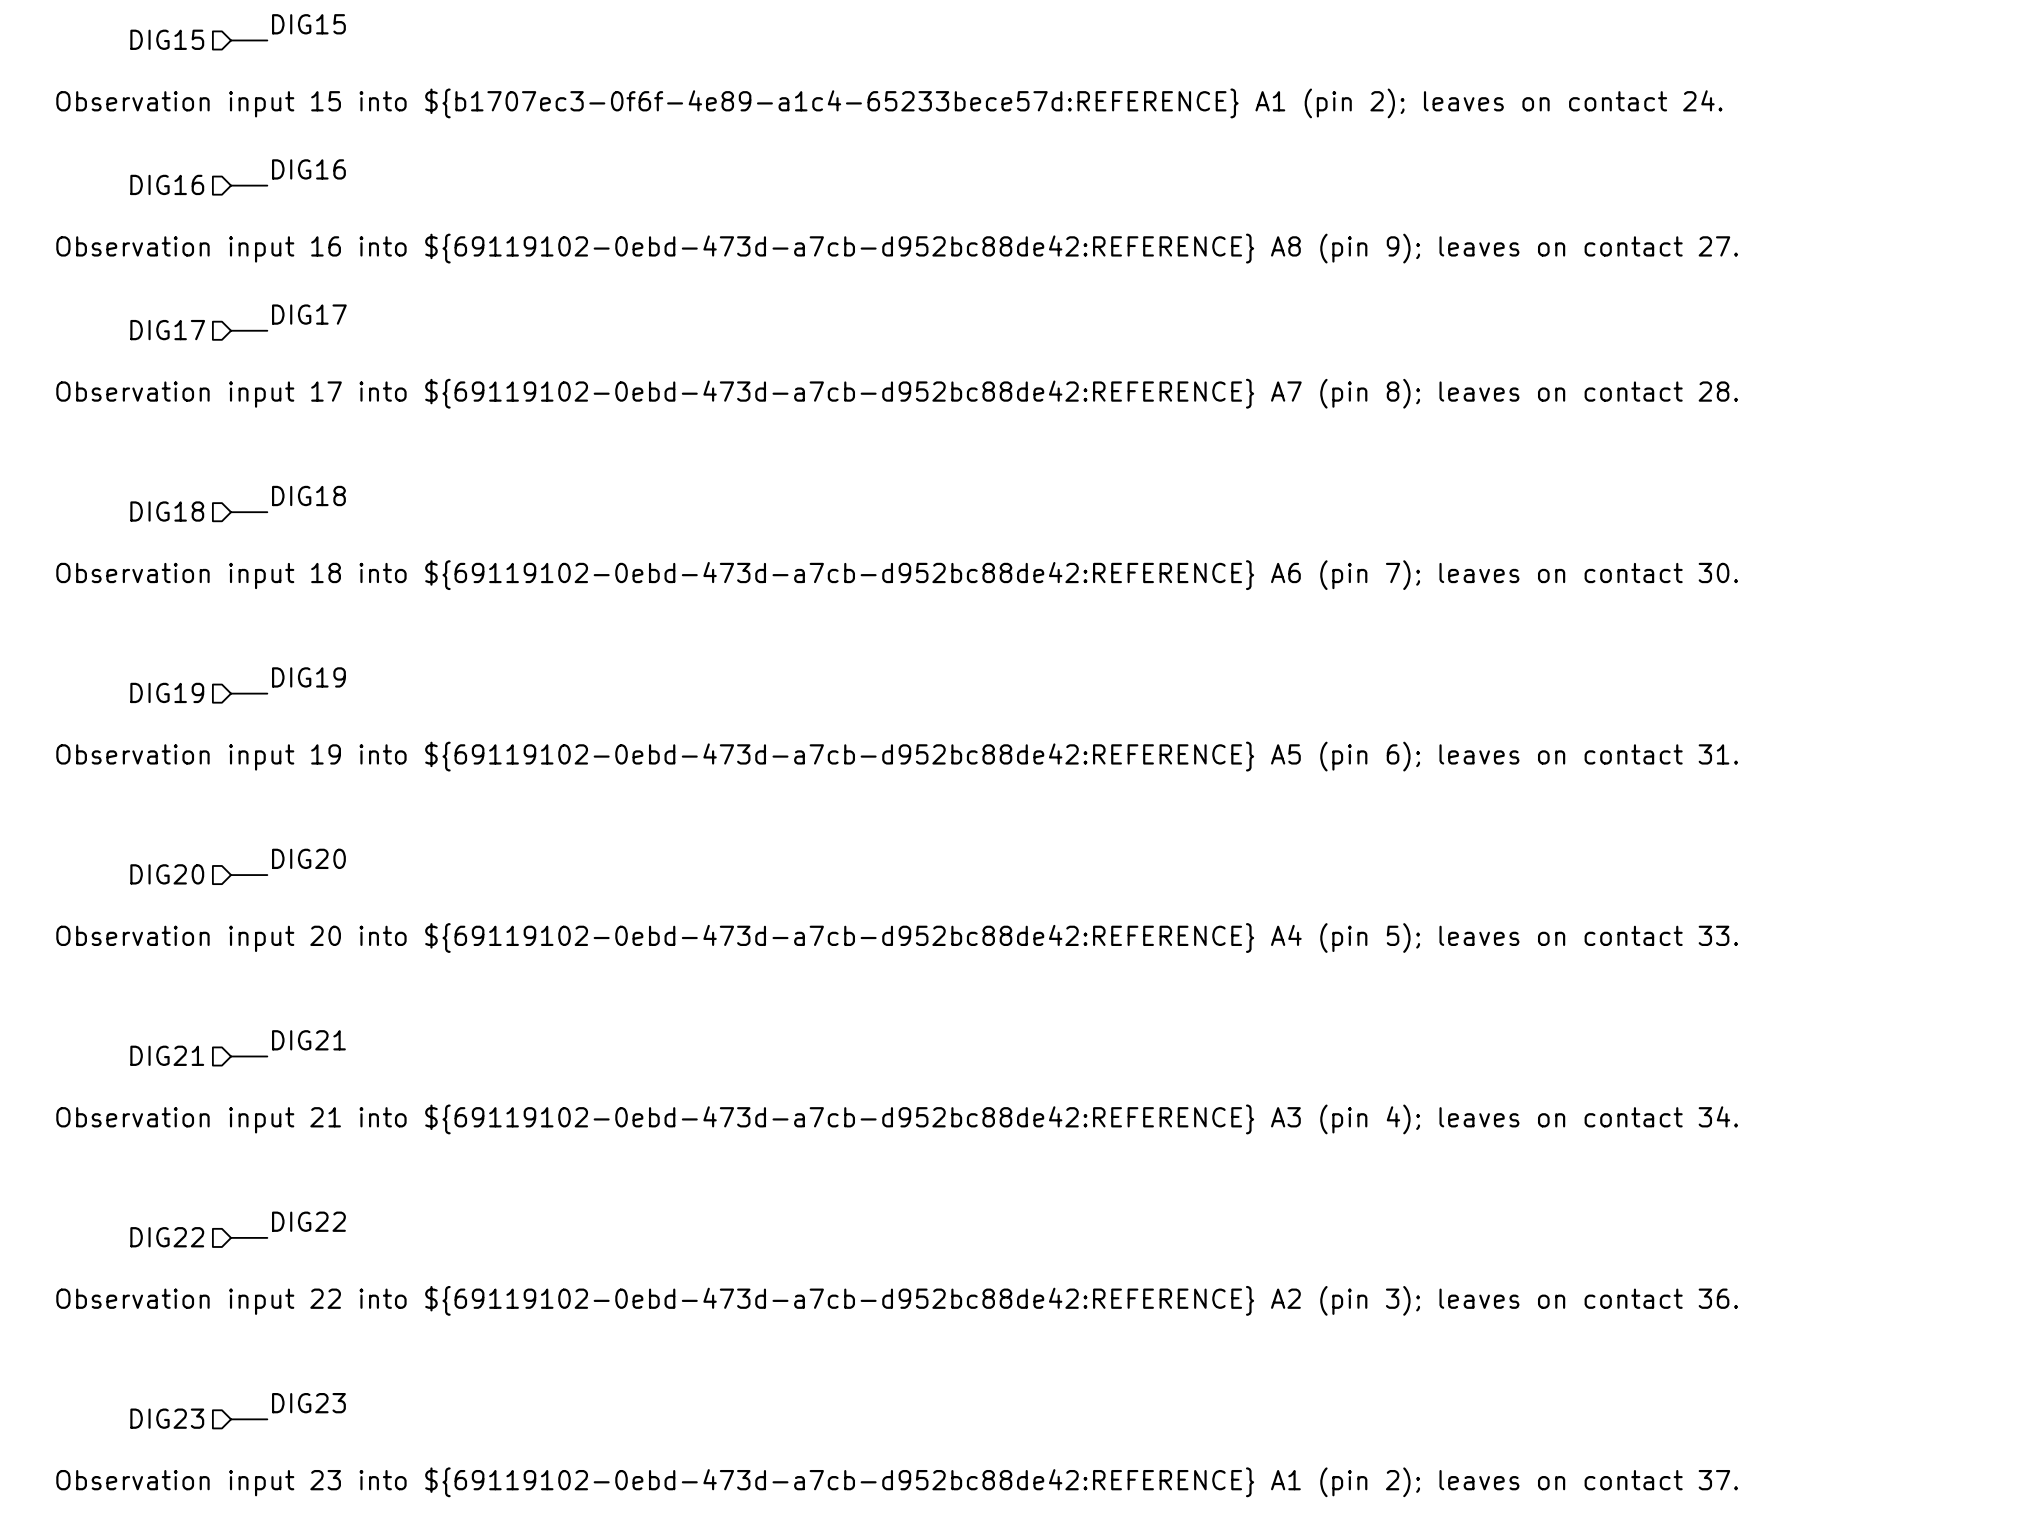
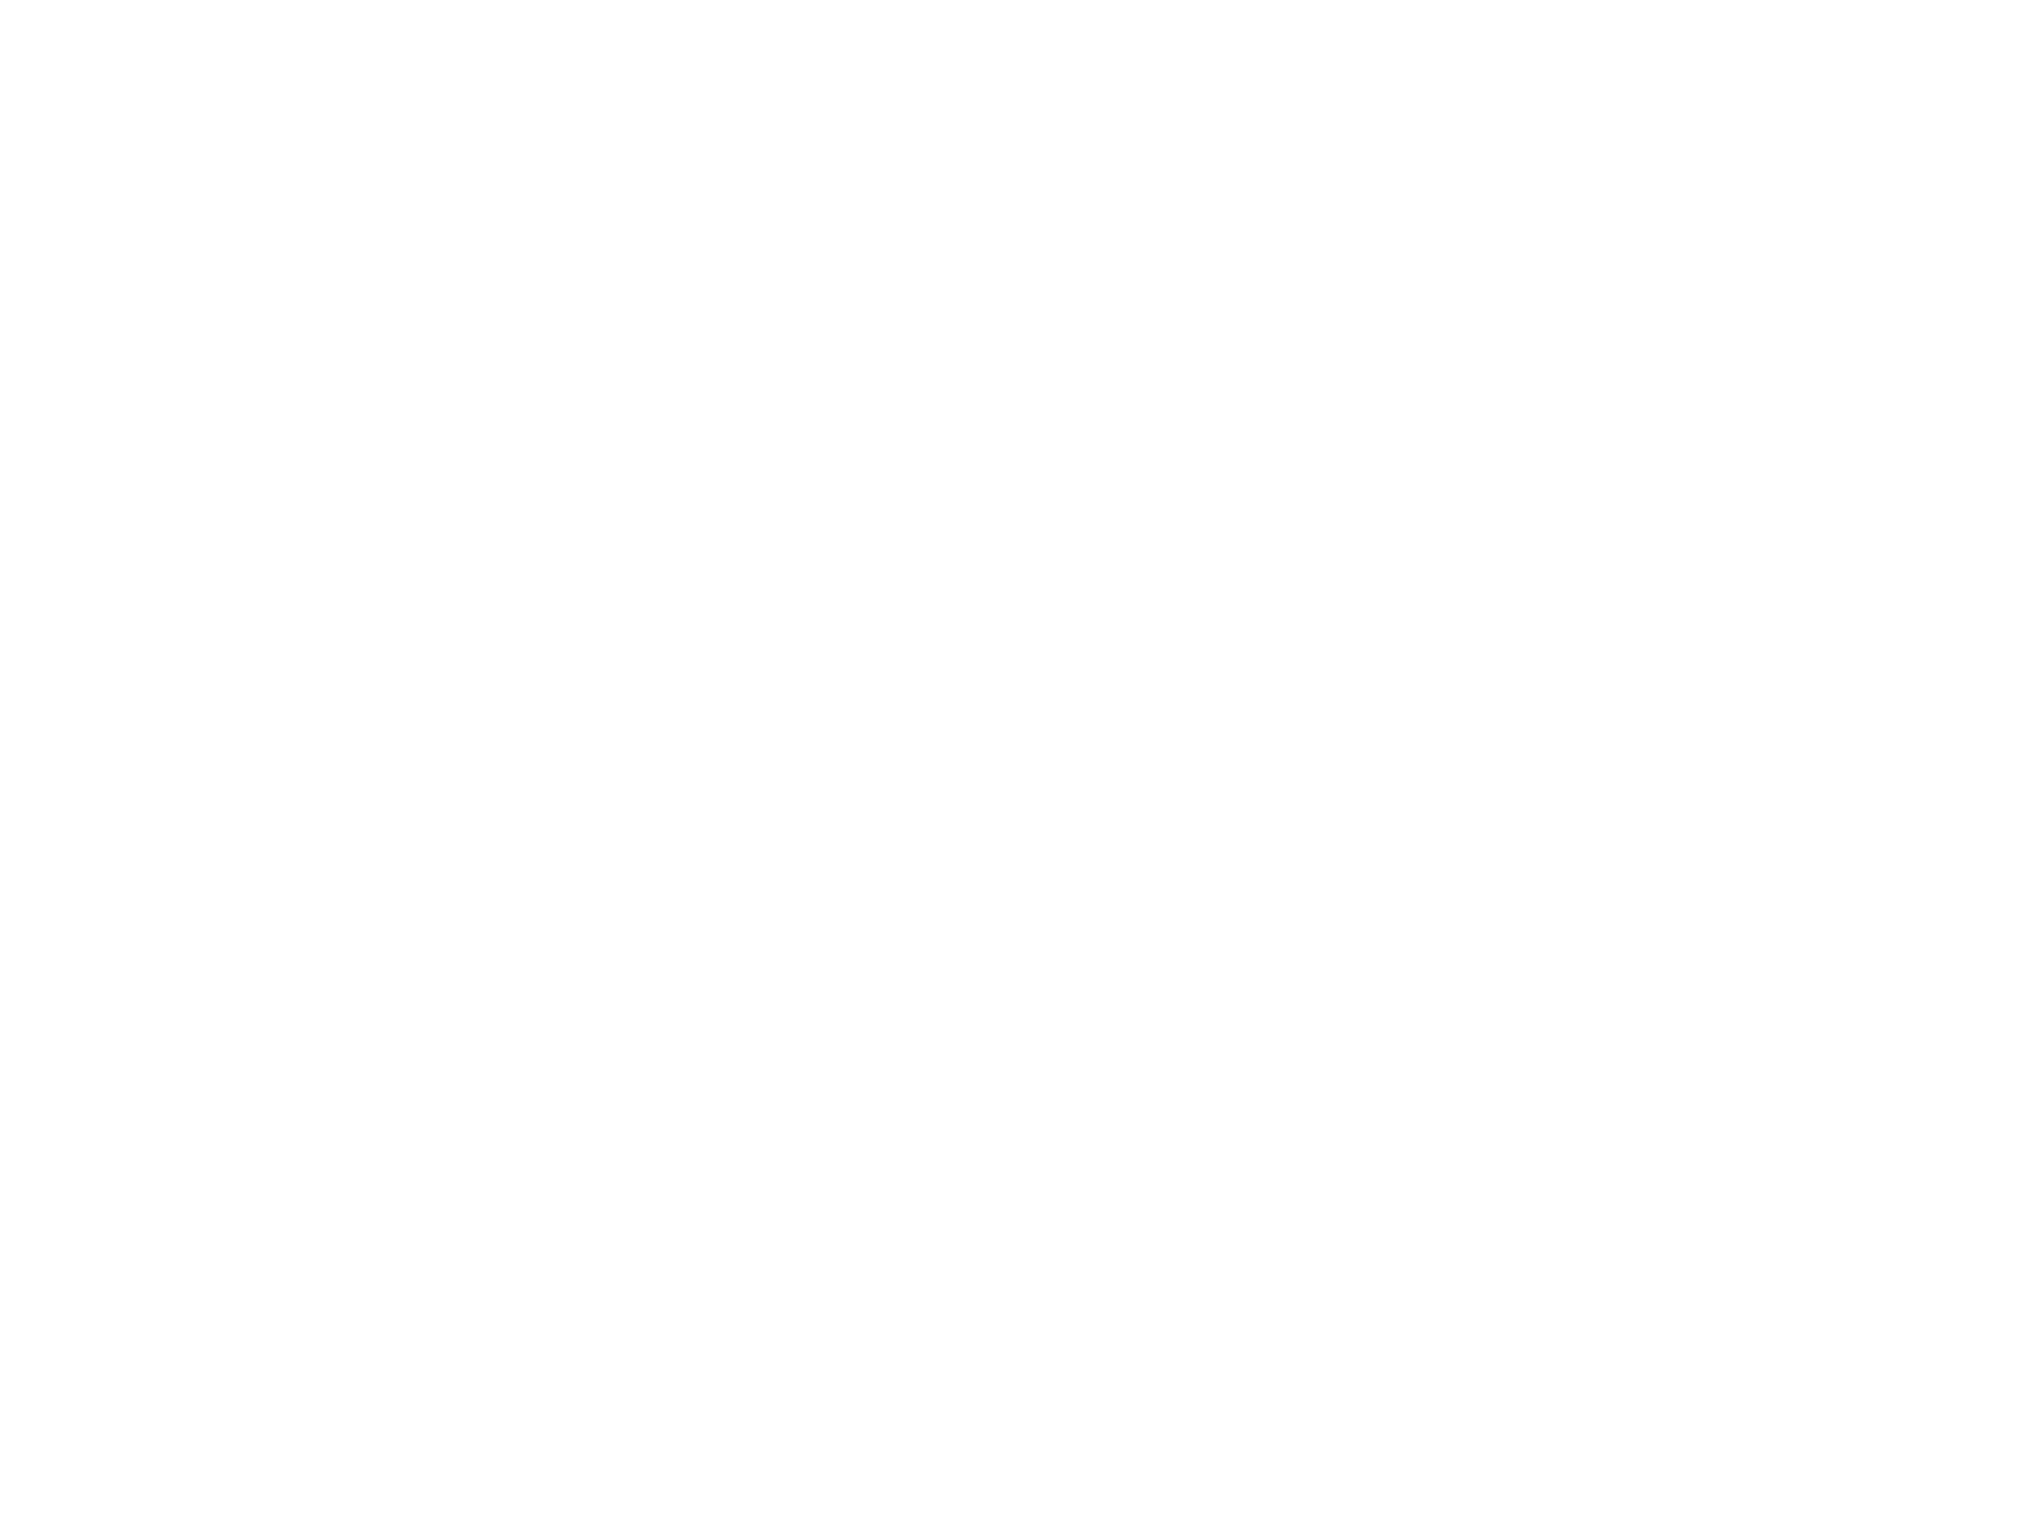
label: DIG15 (308, 24) -> none
hierarchical label: DIG15 (167, 39) -> none
wire: (231, 40) (267, 40) -> none
text: Observation input 15 into ${b1707ec3-0f6f-4e89-a1c4-65233bece57d:REFERENCE} A1 (pin 2); leaves on contact 24. (889, 103) -> none
label: DIG16 (308, 169) -> none
hierarchical label: DIG16 (167, 184) -> none
wire: (231, 185) (267, 185) -> none
text: Observation input 16 into ${69119102-0ebd-473d-a7cb-d952bc88de42:REFERENCE} A8 (pin 9); leaves on contact 27. (897, 248) -> none
label: DIG17 (309, 314) -> none
hierarchical label: DIG17 (167, 330) -> none
wire: (231, 330) (267, 330) -> none
text: Observation input 17 into ${69119102-0ebd-473d-a7cb-d952bc88de42:REFERENCE} A7 (pin 8); leaves on contact 28. (897, 393) -> none
label: DIG18 (308, 496) -> none
hierarchical label: DIG18 (167, 511) -> none
wire: (231, 512) (267, 512) -> none
text: Observation input 18 into ${69119102-0ebd-473d-a7cb-d952bc88de42:REFERENCE} A6 (pin 7); leaves on contact 30. (897, 575) -> none
label: DIG19 (308, 677) -> none
hierarchical label: DIG19 (167, 692) -> none
wire: (231, 693) (267, 693) -> none
text: Observation input 19 into ${69119102-0ebd-473d-a7cb-d952bc88de42:REFERENCE} A5 (pin 6); leaves on contact 31. (897, 756) -> none
label: DIG20 (308, 858) -> none
hierarchical label: DIG20 (167, 874) -> none
wire: (231, 875) (267, 875) -> none
text: Observation input 20 into ${69119102-0ebd-473d-a7cb-d952bc88de42:REFERENCE} A4 (pin 5); leaves on contact 33. (897, 938) -> none
label: DIG21 (308, 1040) -> none
hierarchical label: DIG21 (167, 1055) -> none
wire: (231, 1056) (267, 1056) -> none
text: Observation input 21 into ${69119102-0ebd-473d-a7cb-d952bc88de42:REFERENCE} A3 (pin 4); leaves on contact 34. (897, 1119) -> none
label: DIG22 (308, 1221) -> none
hierarchical label: DIG22 (167, 1237) -> none
wire: (231, 1237) (267, 1237) -> none
text: Observation input 22 into ${69119102-0ebd-473d-a7cb-d952bc88de42:REFERENCE} A2 (pin 3); leaves on contact 36. (897, 1300) -> none
label: DIG23 (308, 1403) -> none
hierarchical label: DIG23 (167, 1418) -> none
wire: (231, 1419) (267, 1419) -> none
text: Observation input 23 into ${69119102-0ebd-473d-a7cb-d952bc88de42:REFERENCE} A1 (pin 2); leaves on contact 37. (897, 1482) -> none

